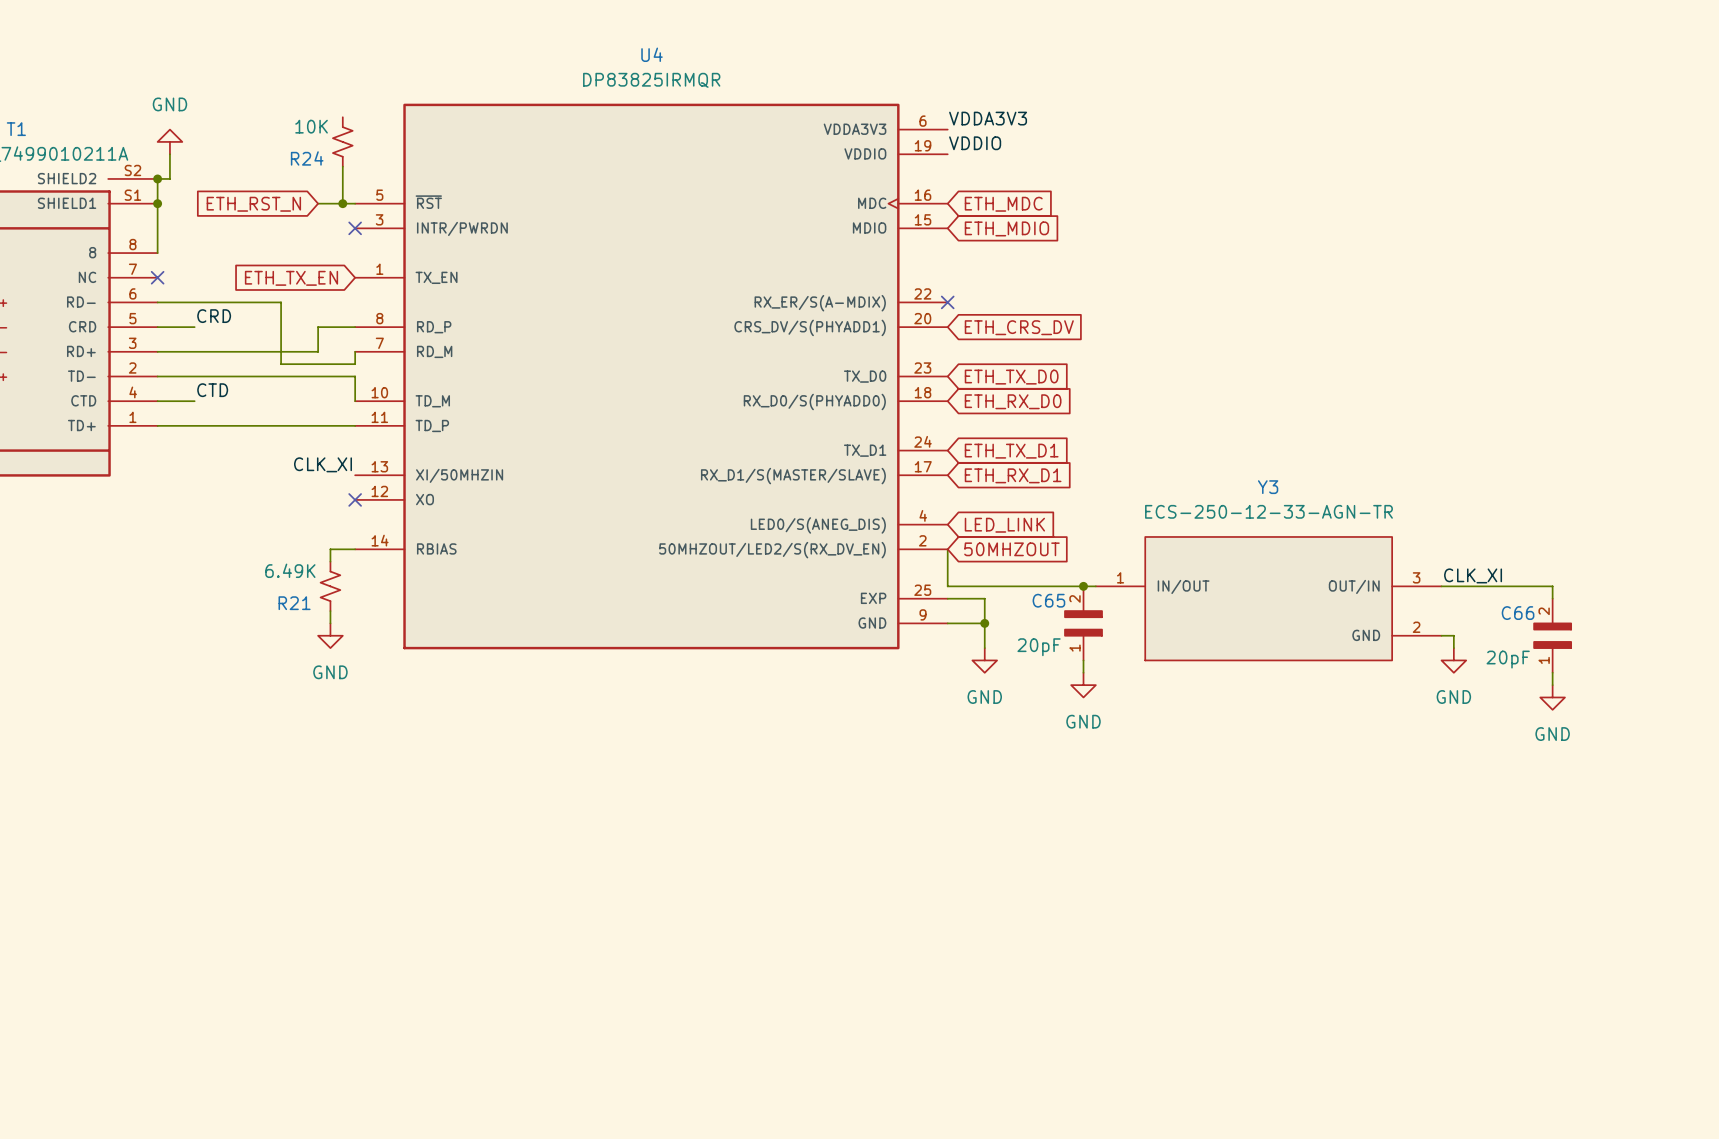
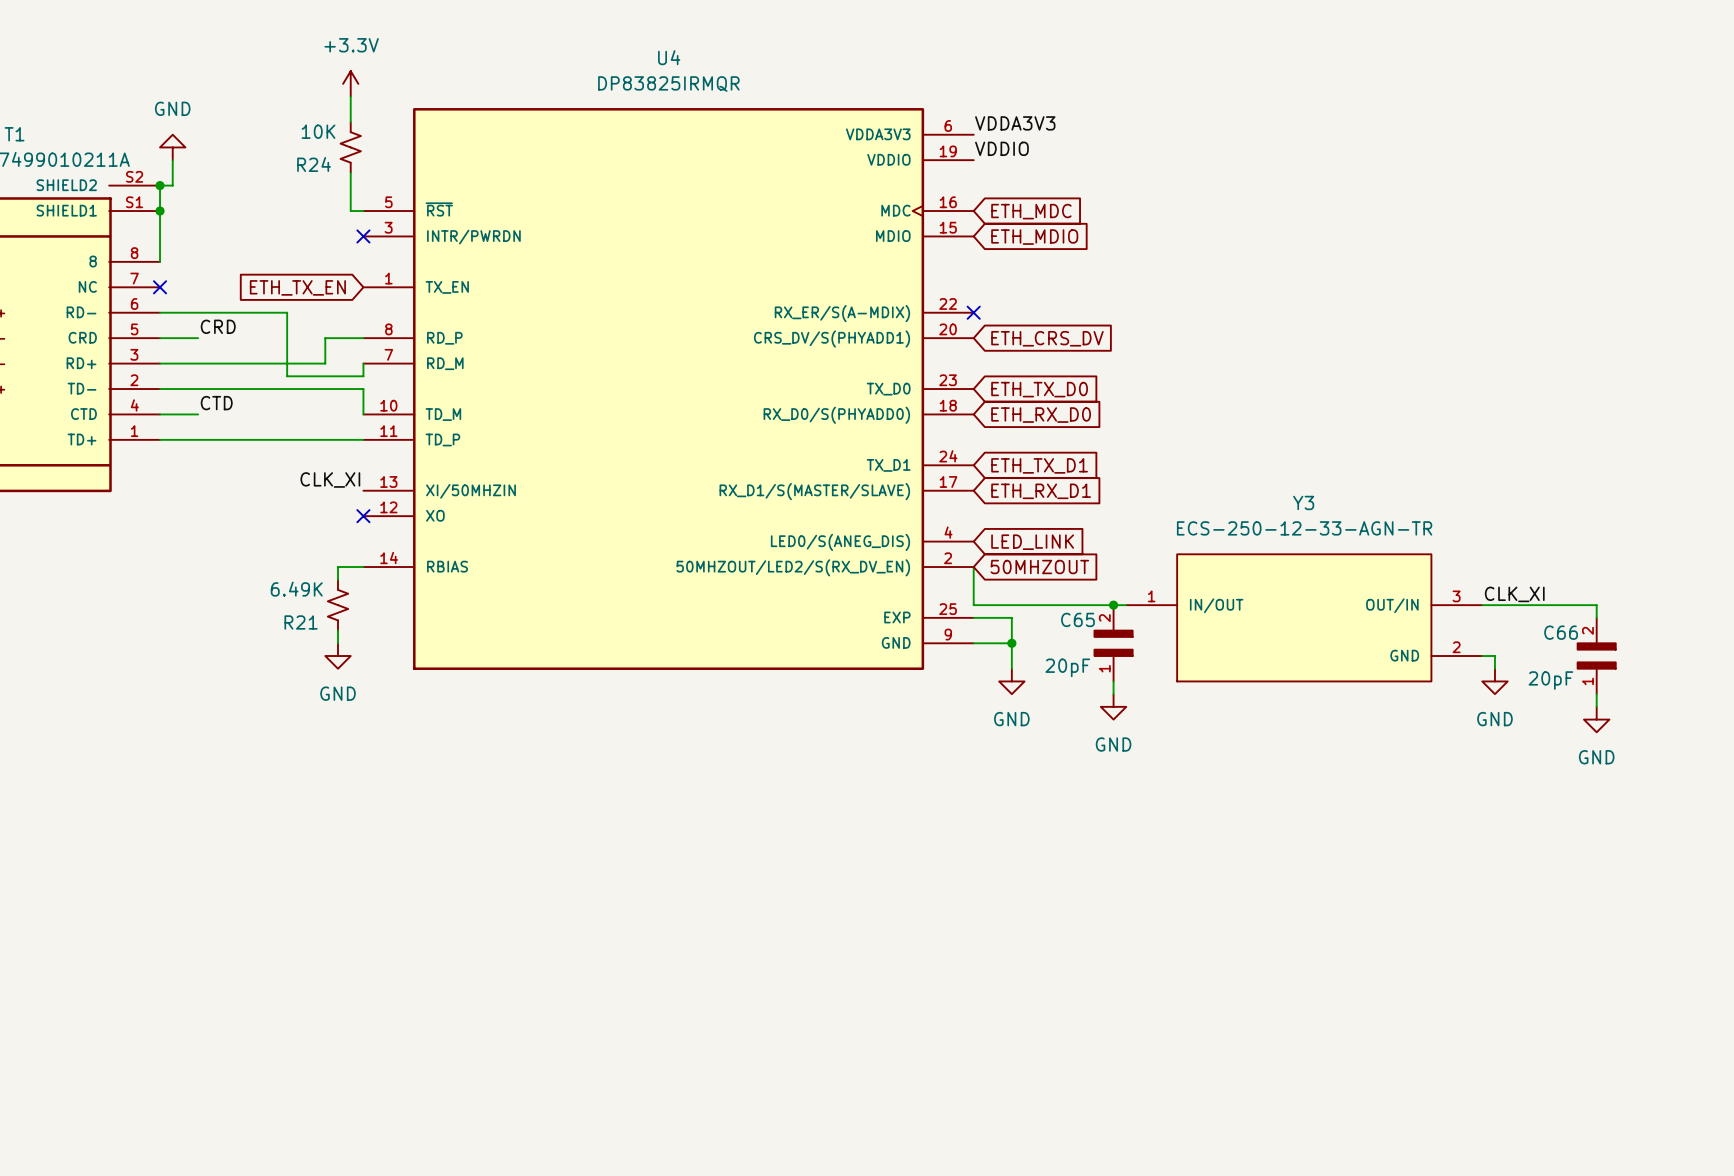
power symbol: none -> +3.3V (350, 83)
wire: none -> (350, 96) (350, 122)
wire: (318, 203) (342, 203) -> none
junction: (342, 203) -> none
global label: ETH_RST_N (253, 204) -> none

